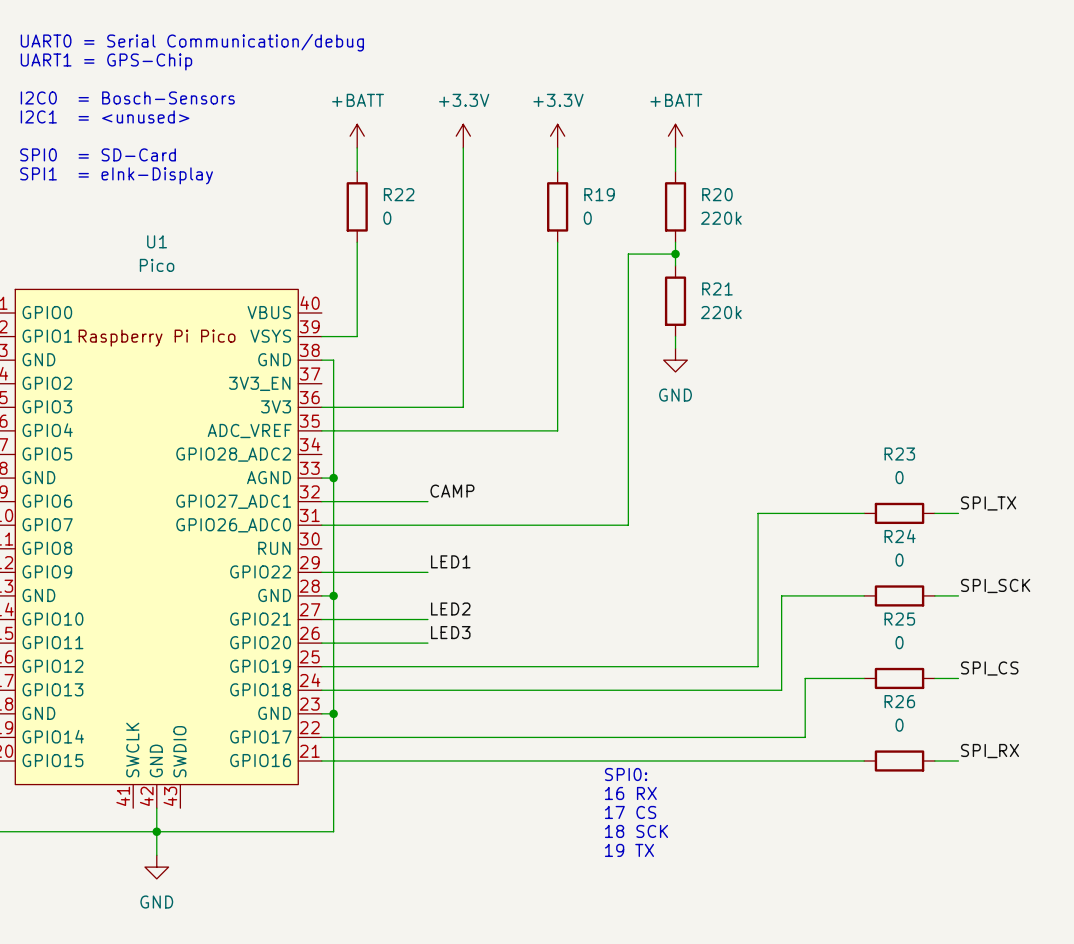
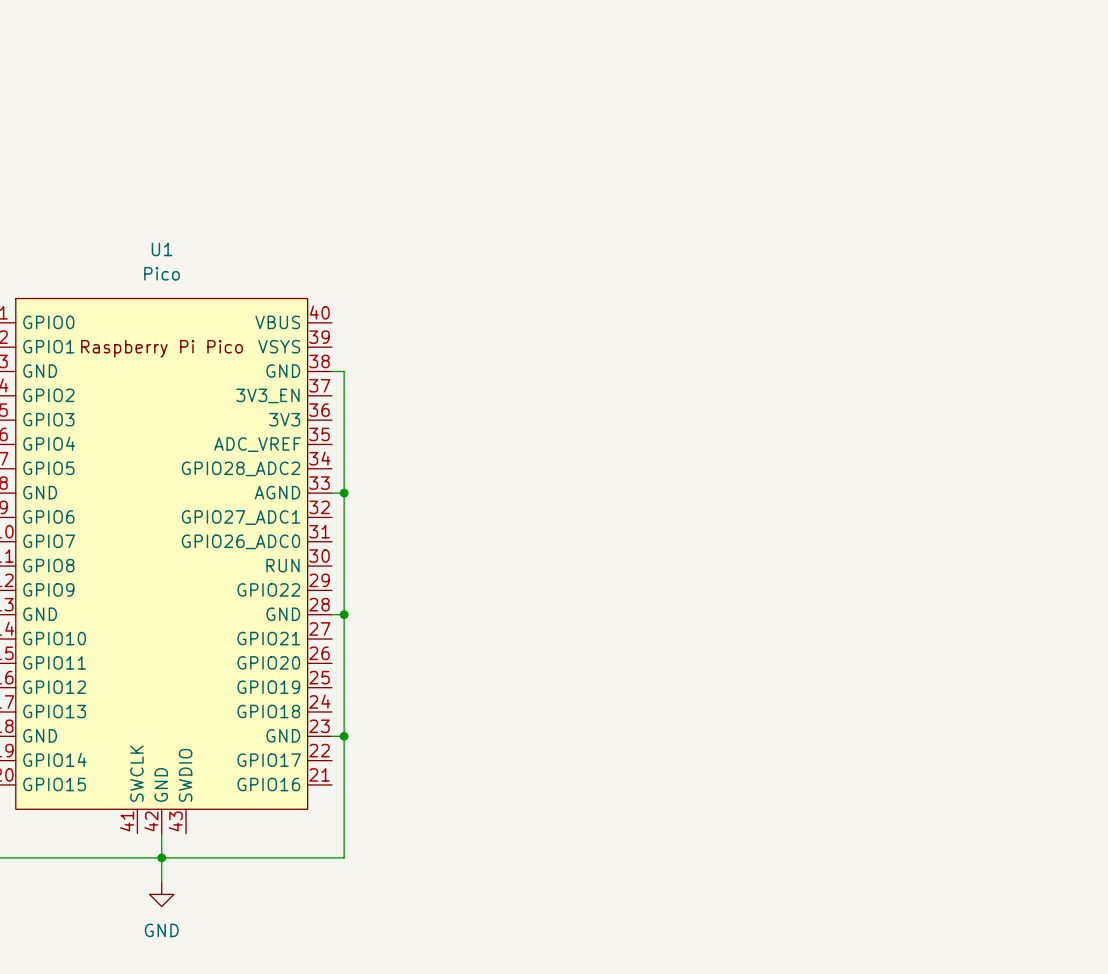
text: UART0 = Serial Communication/debug (192, 42) -> none
text: UART1 = GPS-Chip (106, 61) -> none
text: I2C0 = Bosch-Sensors (127, 97) -> none
text: I2C1 = <unused> (105, 116) -> none
power symbol: +BATT (357, 136) -> none
power symbol: +3.3V (463, 136) -> none
power symbol: +3.3V (557, 136) -> none
power symbol: +BATT (675, 136) -> none
wire: (357, 147) (357, 171) -> none
wire: (463, 147) (463, 407) (321, 407) -> none
wire: (557, 147) (557, 171) -> none
wire: (675, 147) (675, 171) -> none
text: SPI0 = SD-Card (98, 154) -> none
text: SPI1 = eInk-Display (116, 175) -> none
R22: 0 (357, 206) -> none
R19: 0 (557, 206) -> none
R20: 220k (675, 206) -> none
wire: (357, 242) (357, 336) (321, 336) -> none
wire: (557, 242) (557, 430) (321, 430) -> none
wire: (675, 242) (675, 265) -> none
wire: (675, 254) (628, 254) (628, 525) (321, 525) -> none
junction: (675, 254) -> none
R21: 220k (675, 301) -> none
wire: (675, 336) (675, 348) -> none
power symbol: GND (675, 360) -> none
label: CAMP (452, 491) -> none
wire: (321, 501) (427, 501) -> none
label: SPI_TX (988, 503) -> none
wire: (864, 513) (758, 513) (758, 666) (321, 666) -> none
R23: 0 (899, 513) -> none
wire: (934, 513) (958, 513) -> none
label: LED1 (450, 561) -> none
wire: (321, 572) (427, 572) -> none
label: SPI_SCK (995, 585) -> none
wire: (864, 595) (781, 595) (781, 690) (321, 690) -> none
R24: 0 (899, 595) -> none
wire: (934, 595) (958, 595) -> none
label: LED2 (450, 609) -> none
wire: (321, 619) (427, 619) -> none
label: LED3 (450, 632) -> none
wire: (321, 643) (427, 643) -> none
label: SPI_CS (989, 668) -> none
wire: (864, 678) (805, 678) (805, 737) (321, 737) -> none
R25: 0 (899, 678) -> none
wire: (934, 678) (958, 678) -> none
label: SPI_RX (989, 751) -> none
wire: (321, 760) (864, 760) -> none
R26: 0 (899, 760) -> none
wire: (934, 760) (958, 760) -> none
text: SPI0: (626, 774) -> none
text: 16 RX (630, 793) -> none
text: 17 CS (630, 812) -> none
text: 18 SCK (636, 831) -> none
text: 19 TX (629, 850) -> none

